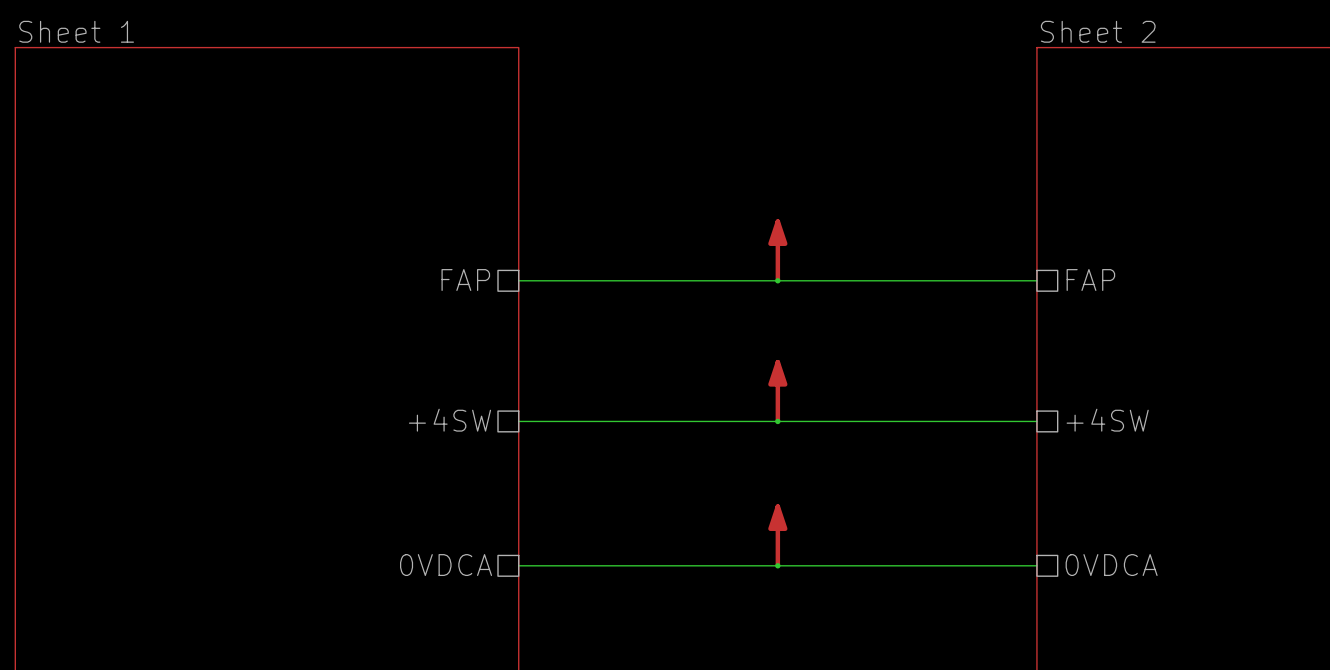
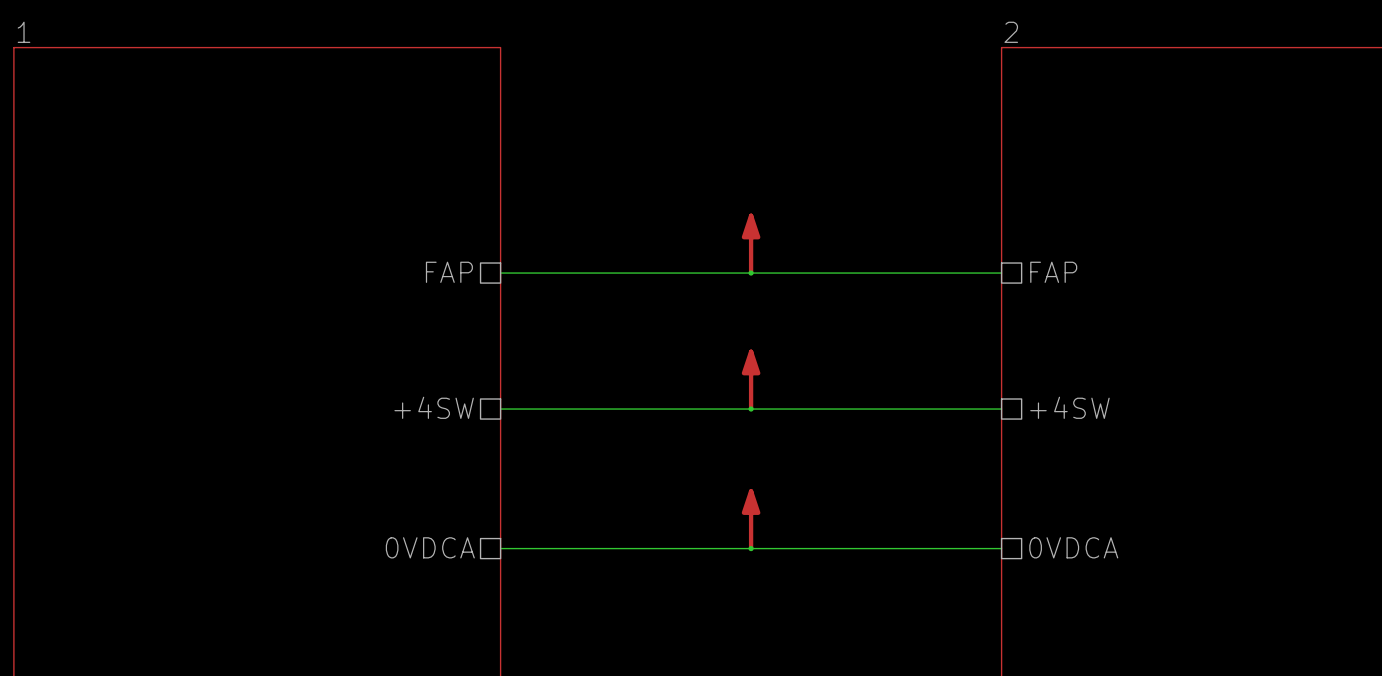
sheet Sheet 1 name: Sheet 1 (76, 31) -> 1 (24, 32)
sheet Sheet 2 name: Sheet 2 (1098, 31) -> 2 (1011, 32)

